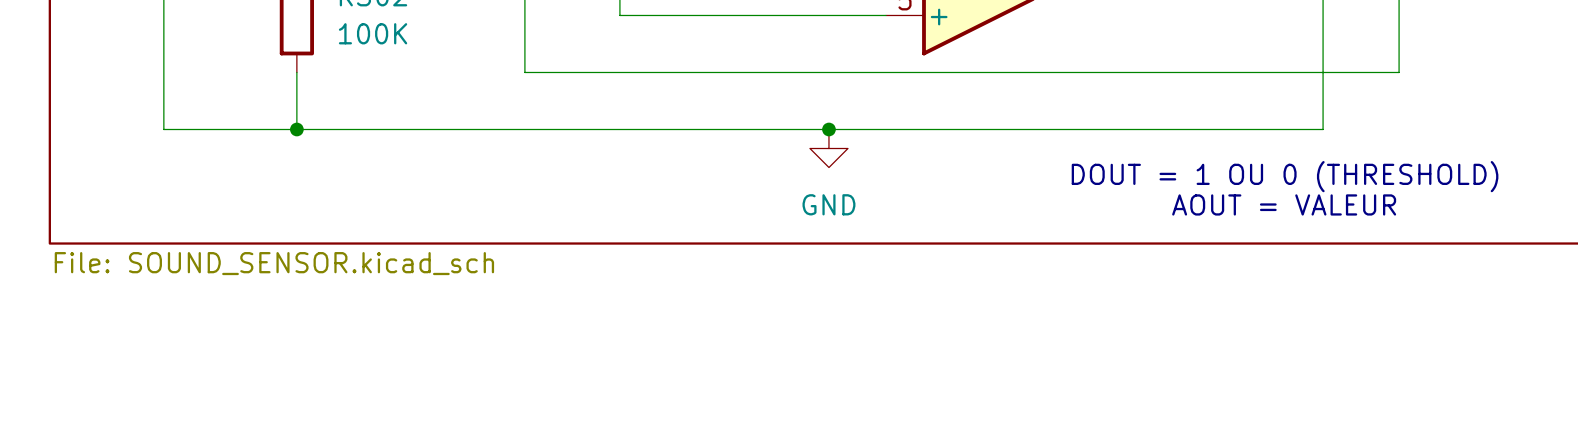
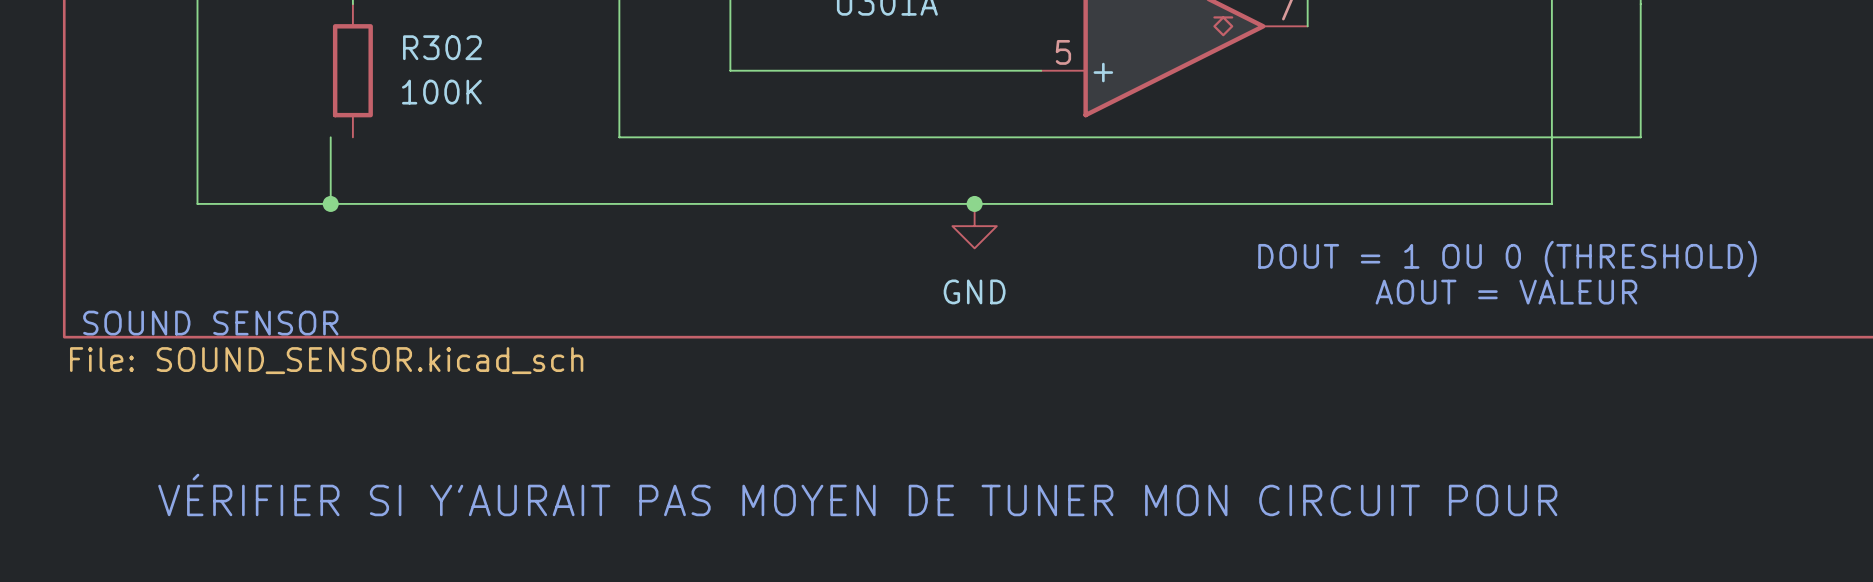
wire: (296, 72) (296, 129) -> (330, 137) (330, 203)
junction position: (296, 129) -> (330, 203)
text: none -> SOUND SENSOR (210, 323)
text: none -> VÉRIFIER SI Y'AURAIT PAS MOYEN DE TUNER MON CIRCUIT POUR (857, 494)

